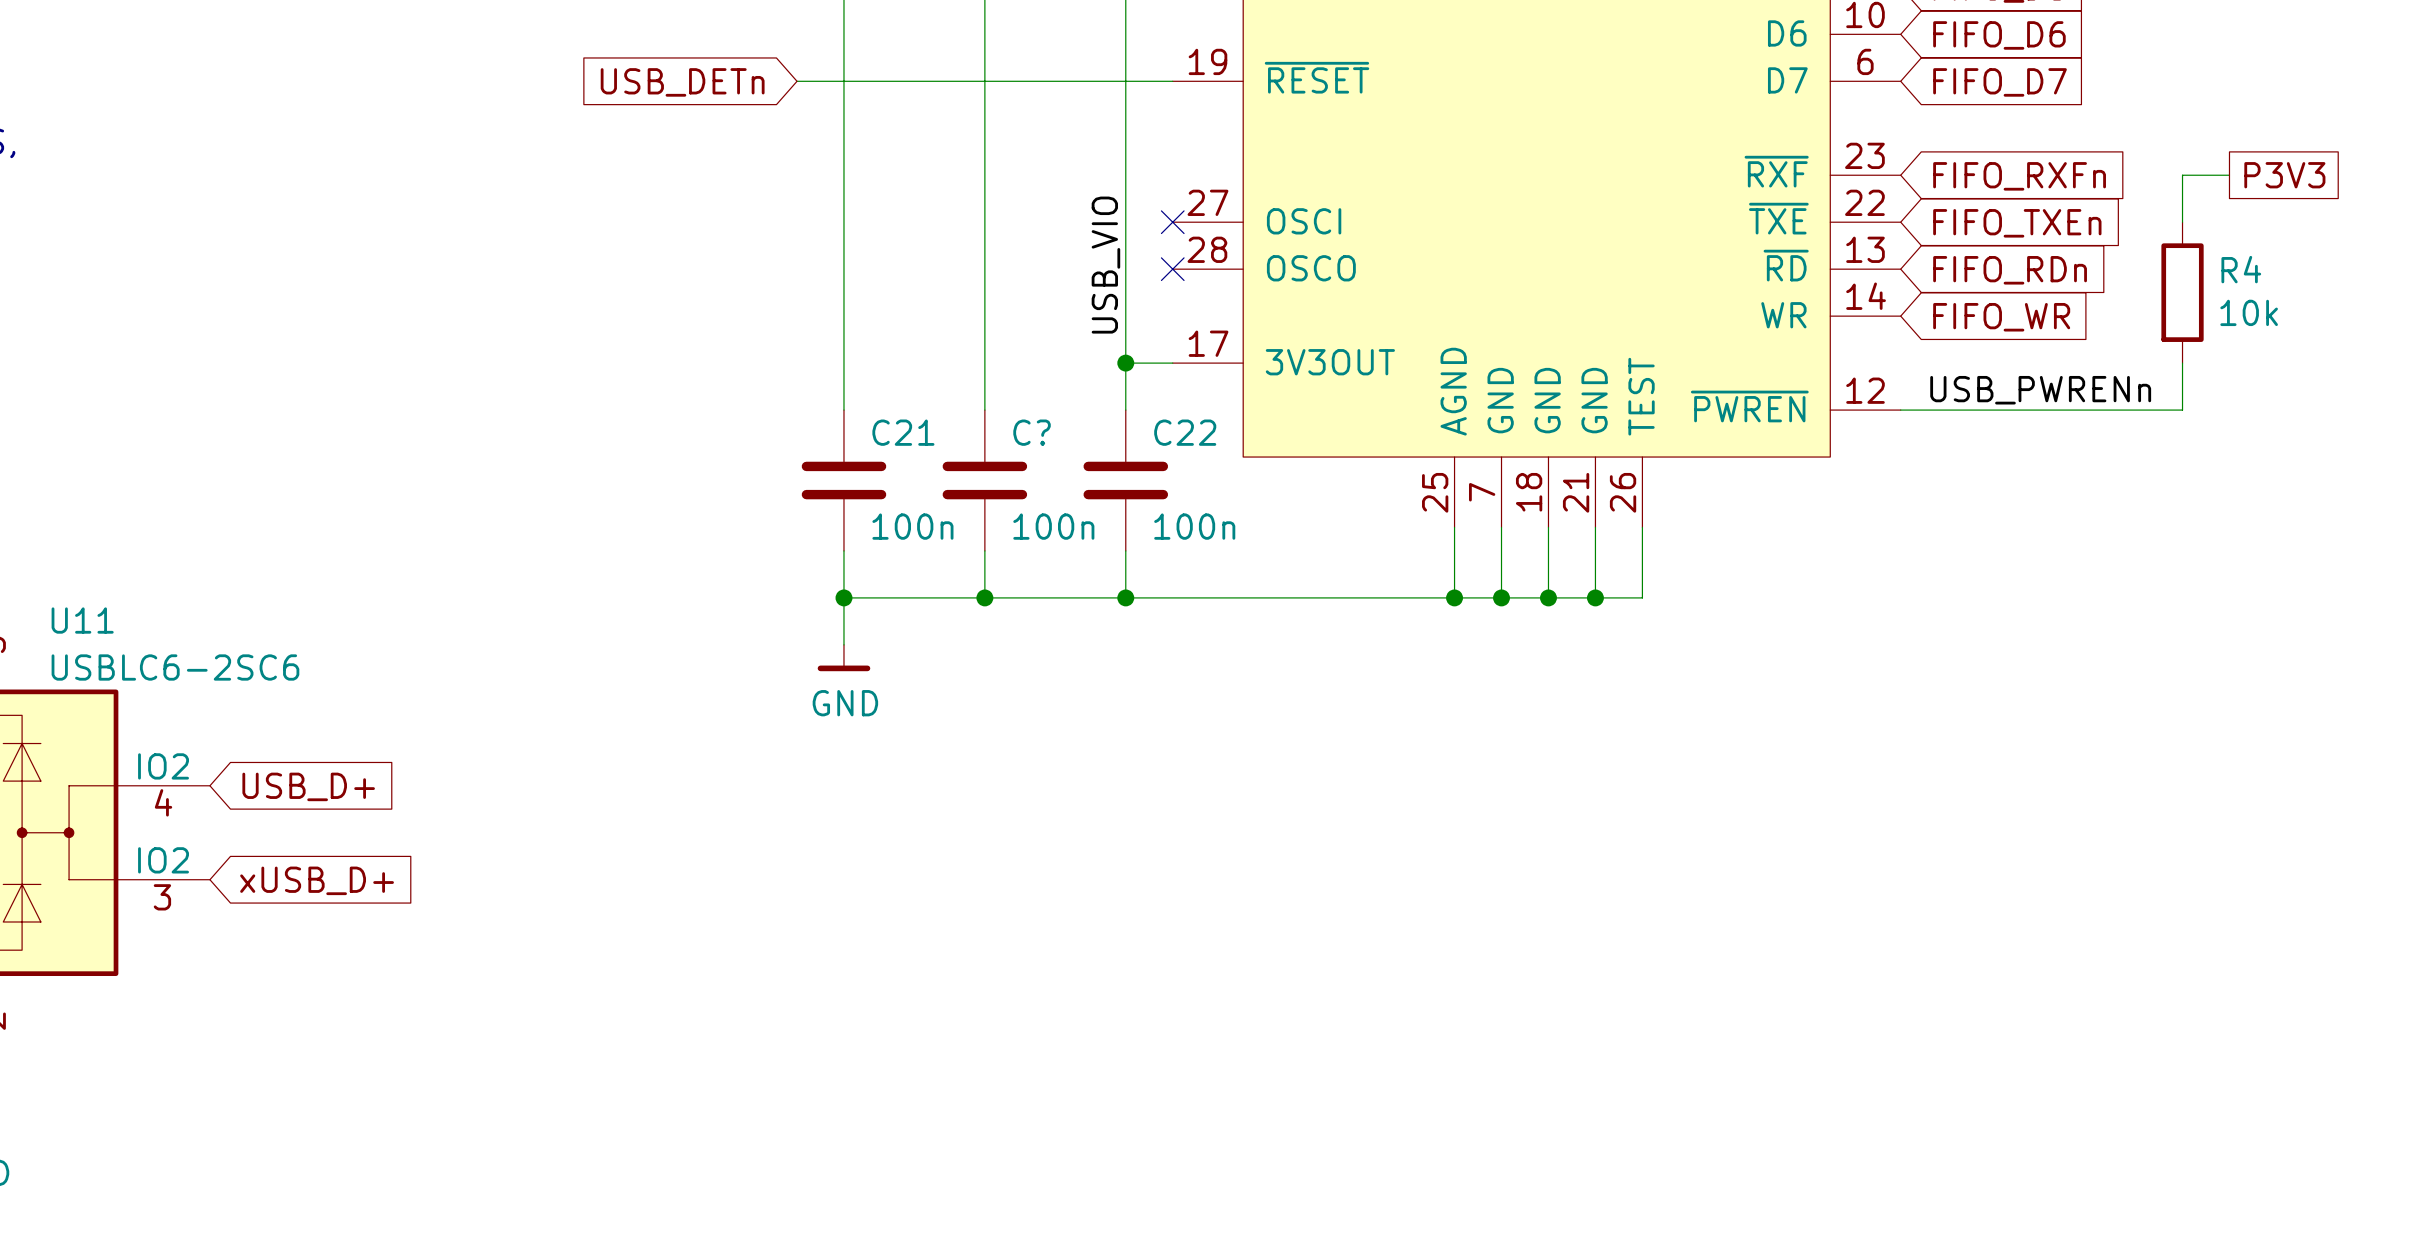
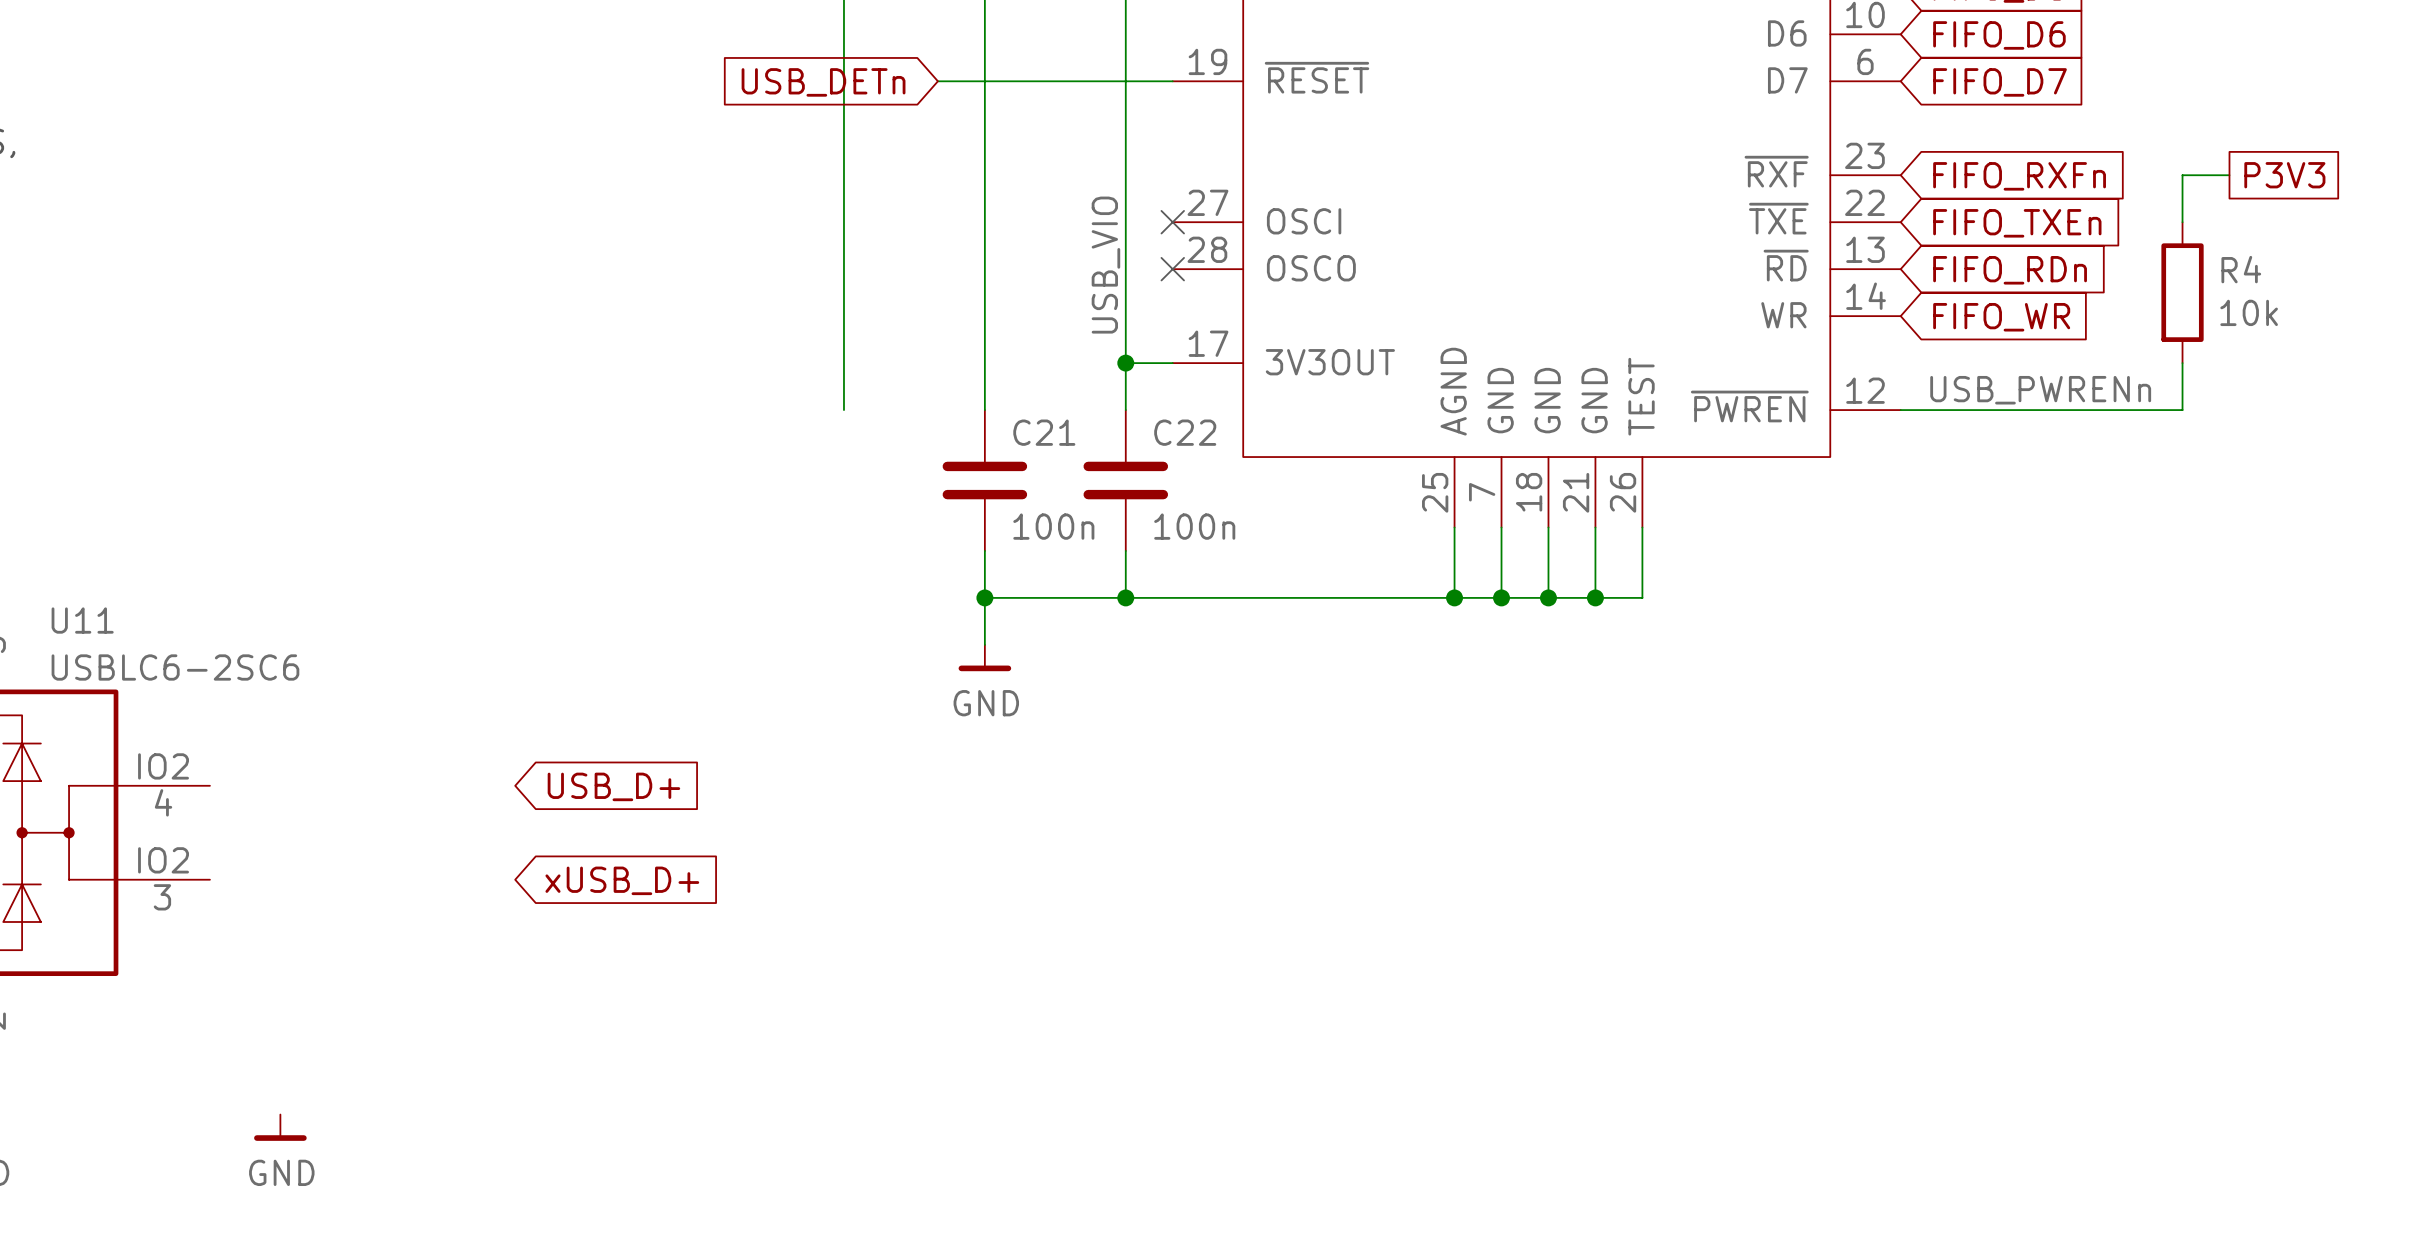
wire: (797, 81) (937, 81) -> none
global label position: USB_DETn (682, 82) -> USB_DETn (823, 82)
C? name: C? (1032, 432) -> C21 (1044, 432)
C21: 100n (843, 480) -> none
wire: (843, 550) (843, 644) -> none
wire: (843, 597) (984, 597) -> (984, 644) (984, 597)
junction: (843, 597) -> none
power symbol position: GND (843, 658) -> GND (984, 658)
global label position: USB_D+ (308, 786) -> USB_D+ (613, 786)
global label position: xUSB_D+ (317, 880) -> xUSB_D+ (622, 880)
power symbol: none -> GND (280, 1127)

